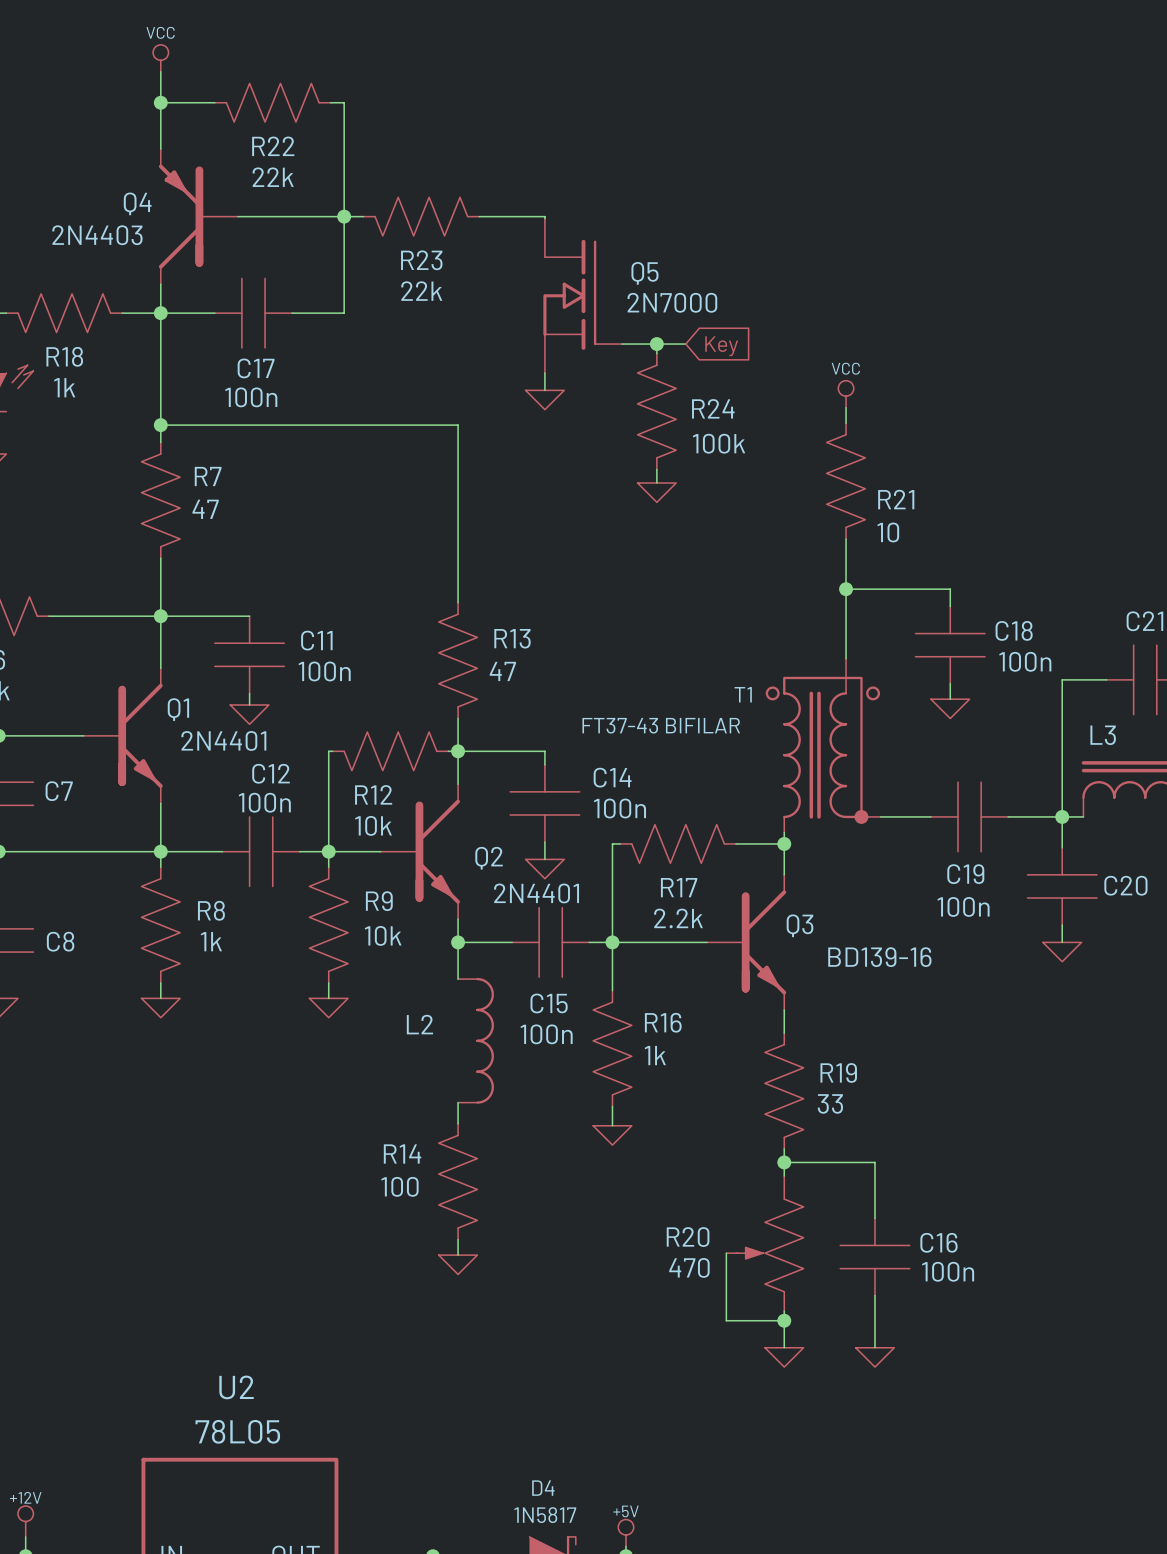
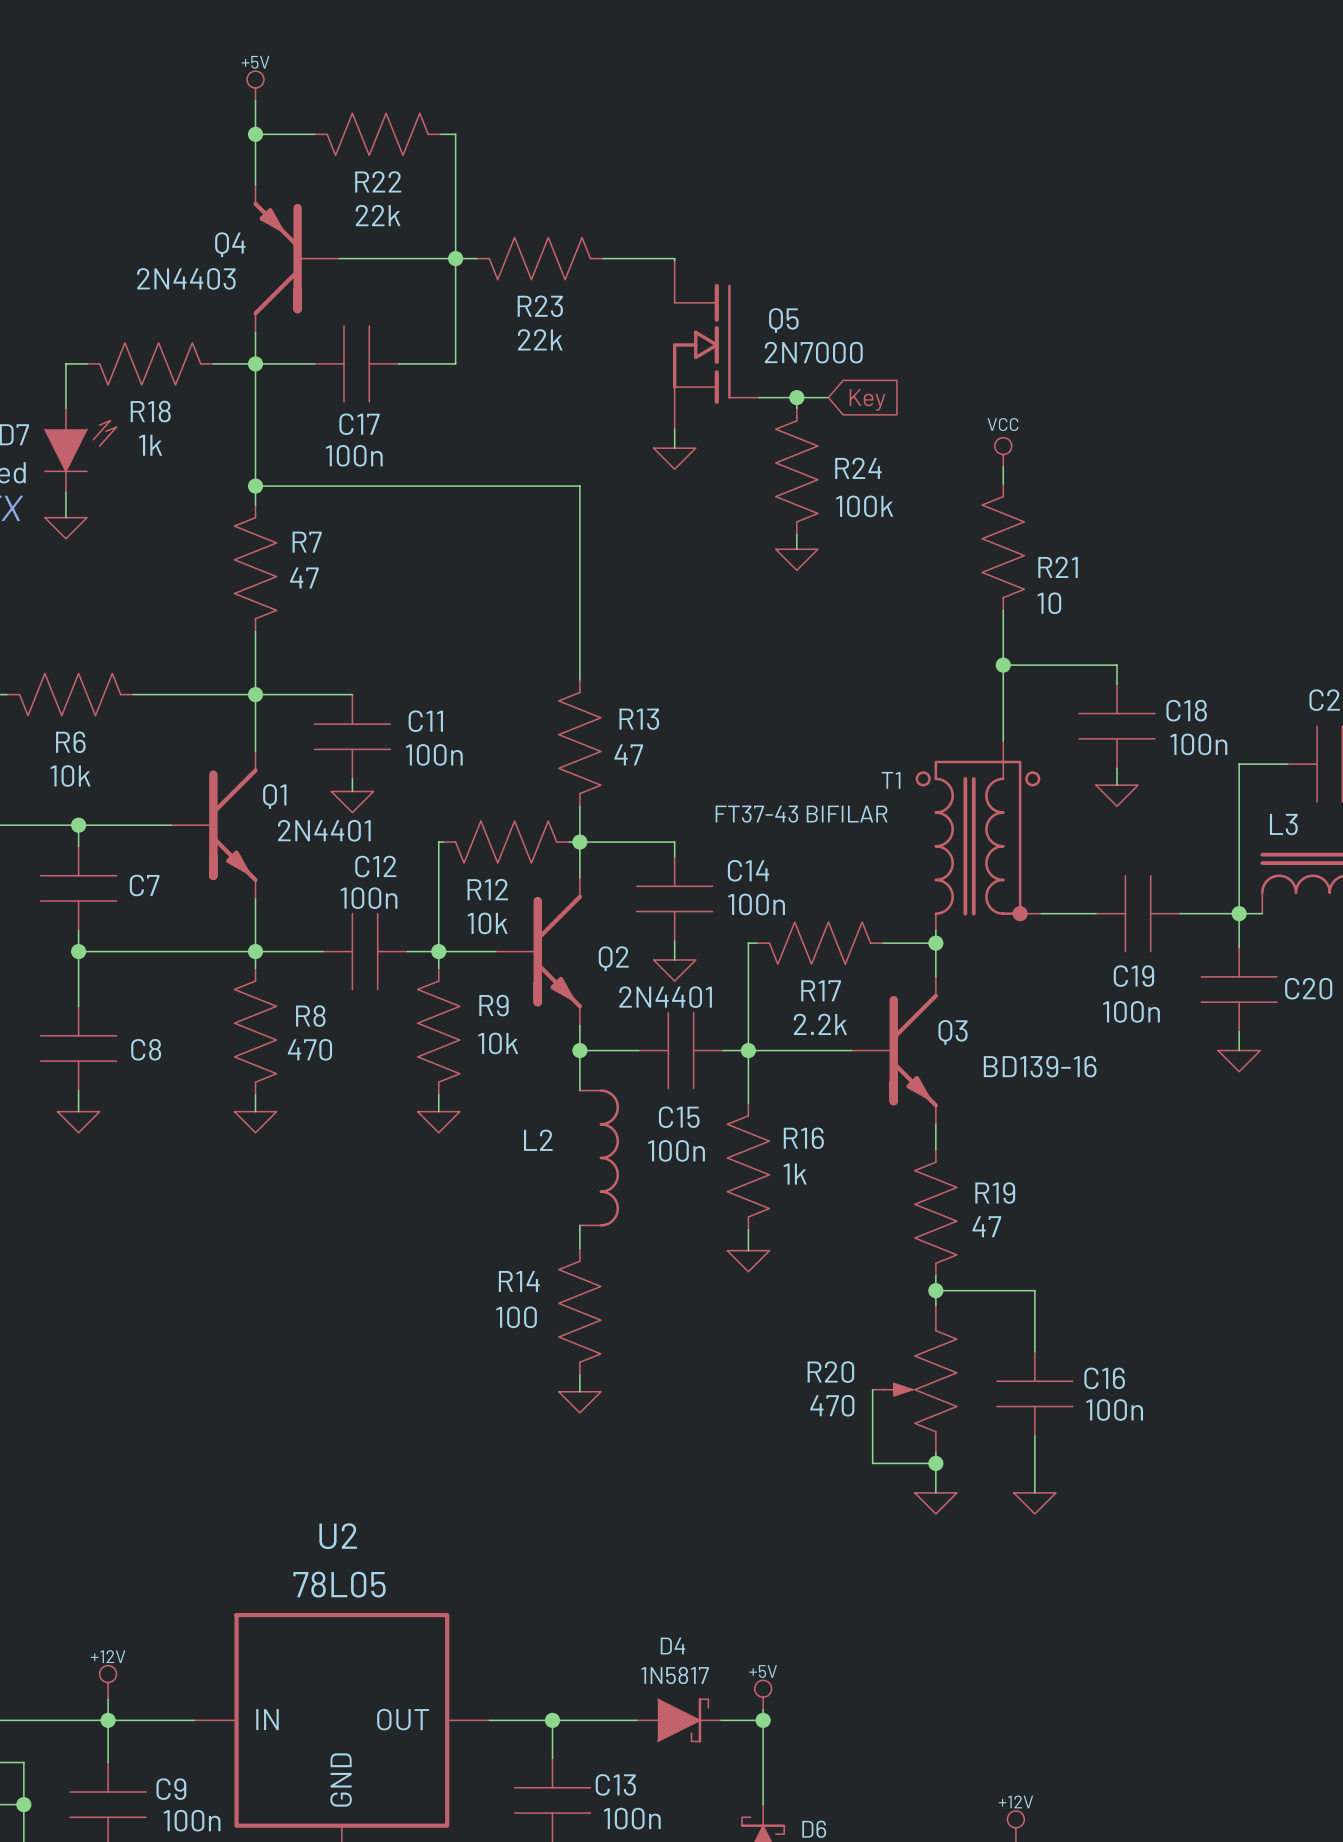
power symbol: VCC (160, 58) -> +5V (255, 85)
R8 value: 1k (211, 941) -> 470 (309, 1049)
R19 value: 33 (830, 1103) -> 47 (986, 1226)

